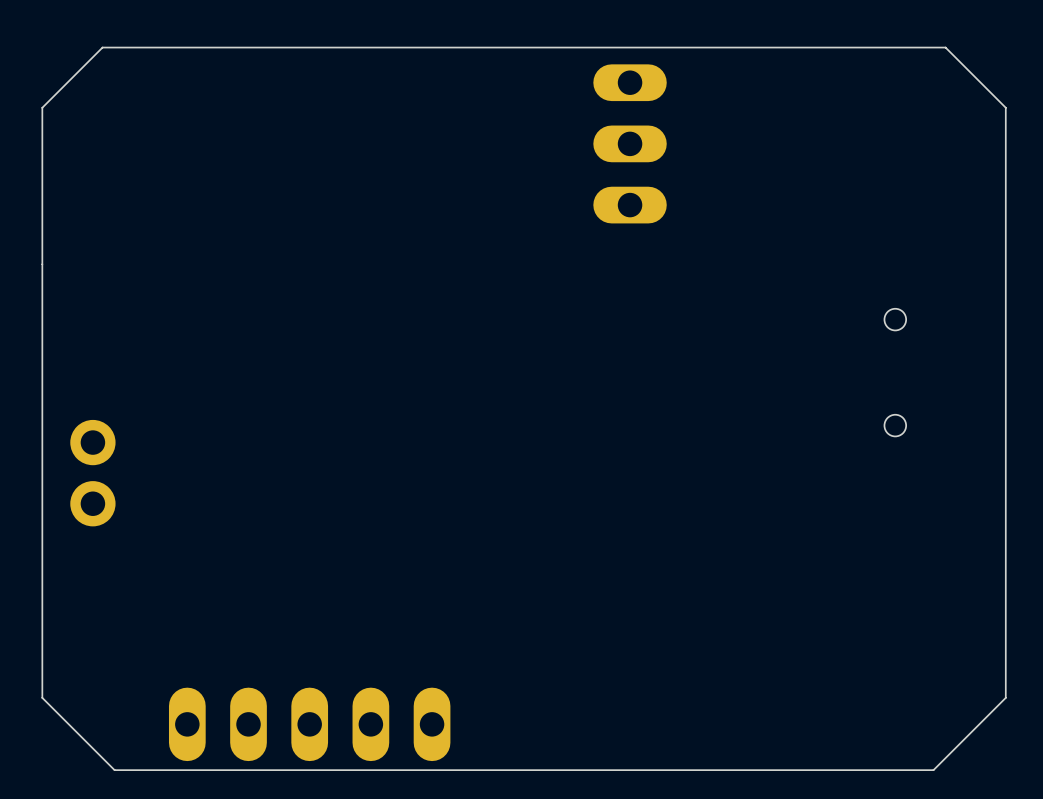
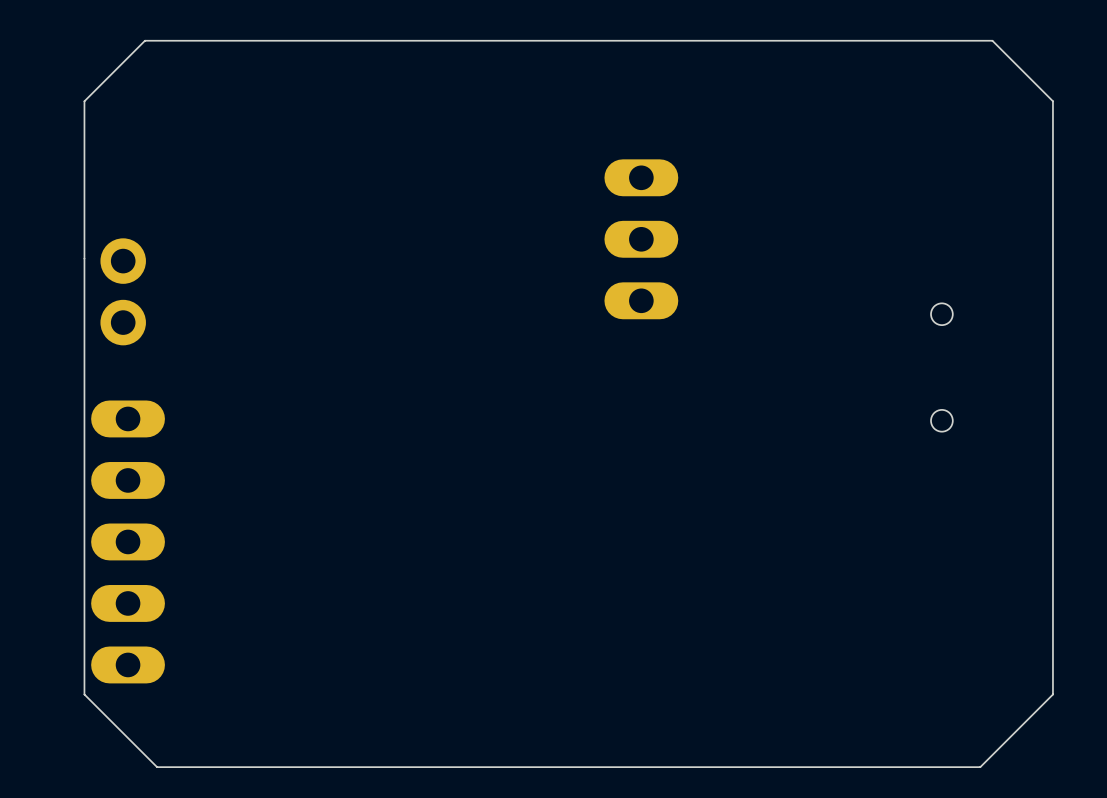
part position: (630, 143) -> (641, 239)
part position: (92, 473) -> (123, 291)
part rotation: 0° (309, 724) -> 90° clockwise (128, 541)
part position: (309, 724) -> (128, 541)

